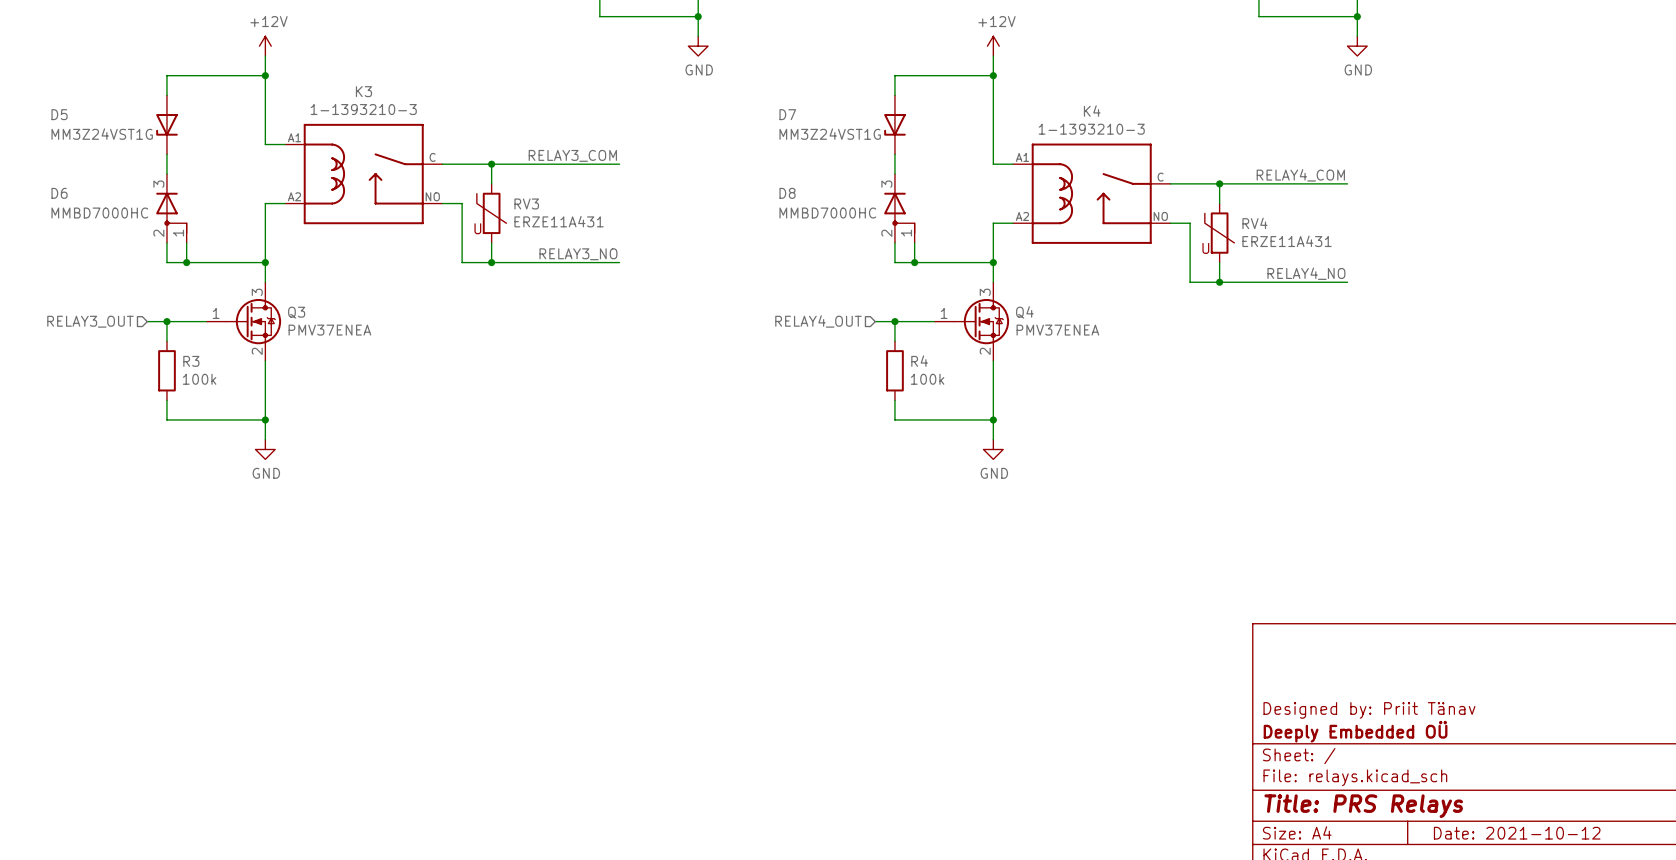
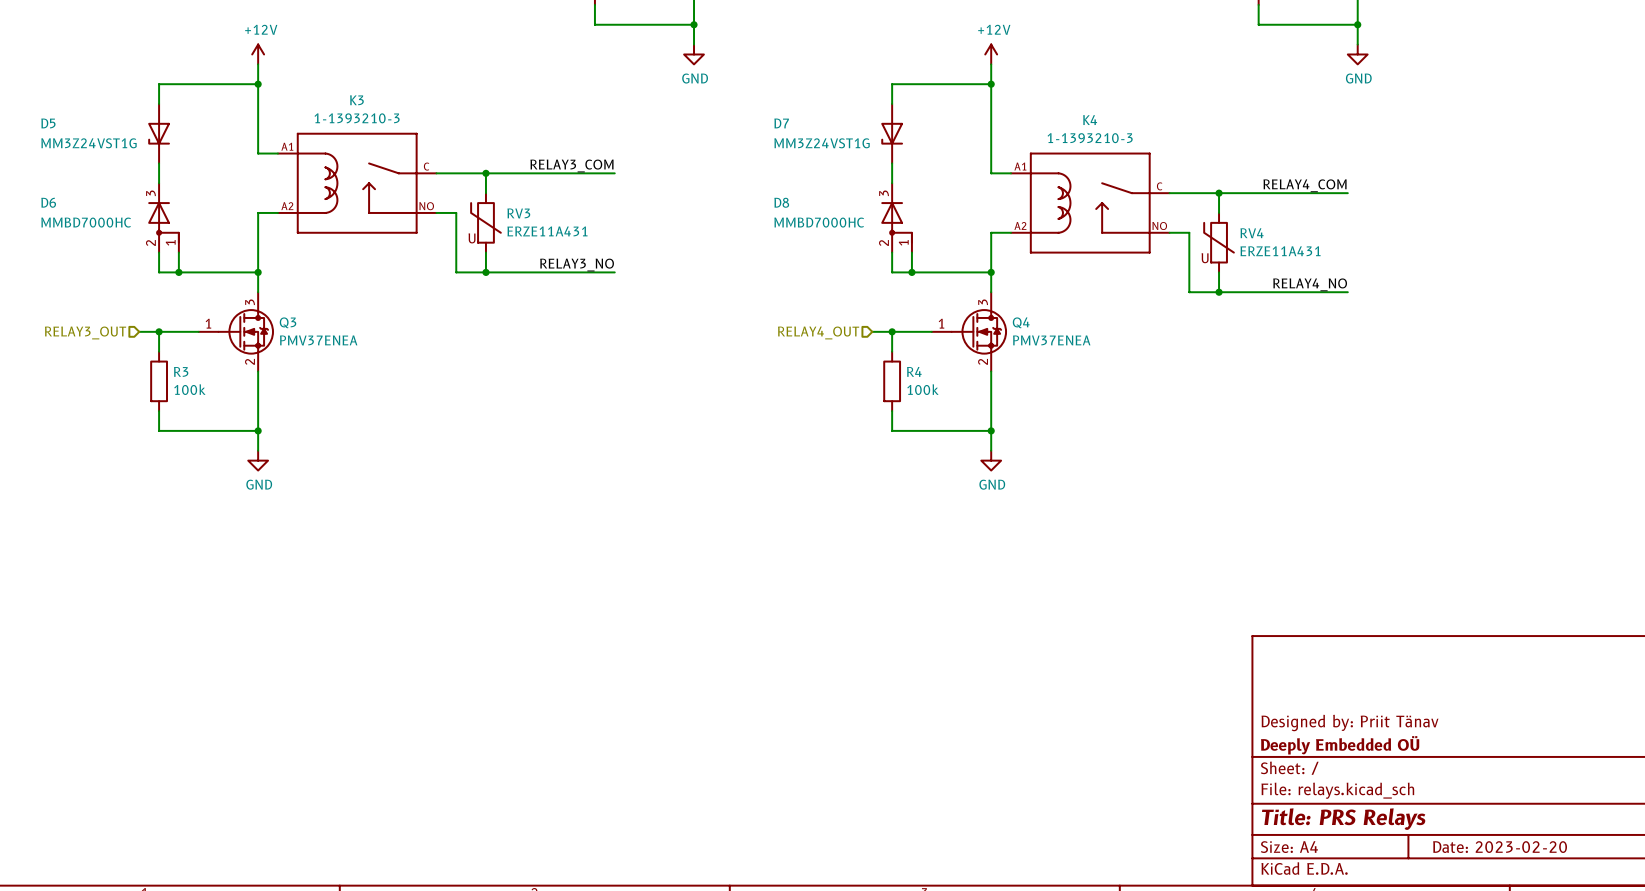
title block: Date: 2021-10-12 (1517, 833) -> Date: 2023-02-20 (1500, 847)

